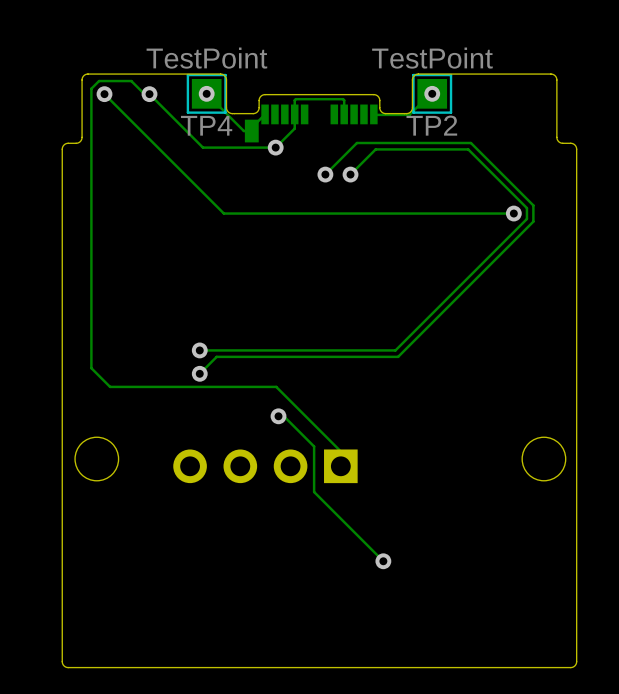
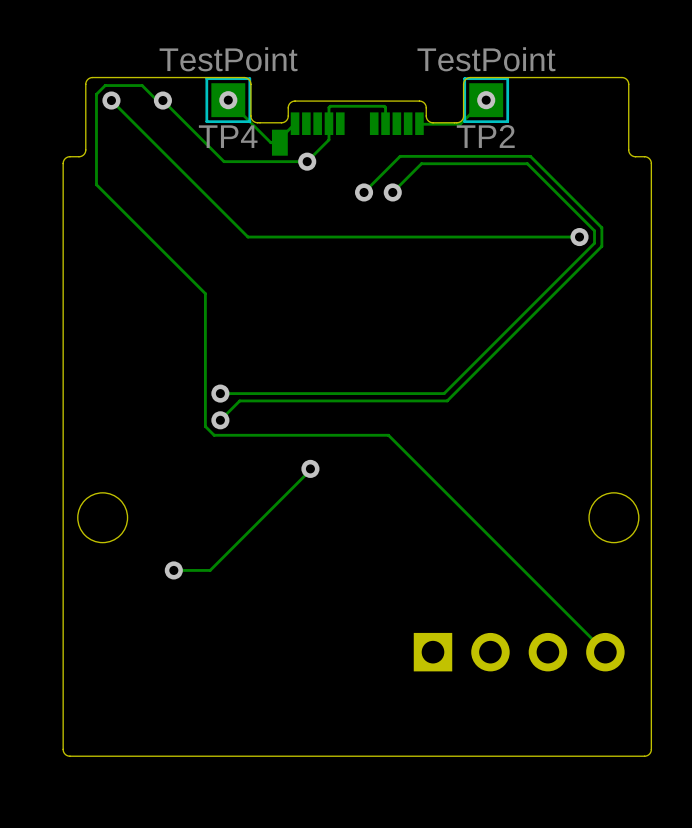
track: (91, 167) (91, 368) (110, 386) (194, 386) -> (96, 184) (205, 293) (205, 426) (214, 435)
track: (276, 386) (340, 451) (340, 466) -> (307, 435) (388, 435) (605, 652)
track: (278, 416) (283, 416) (314, 446) (314, 492) (383, 561) -> none
track: none -> (306, 474) (210, 570) (173, 570)
part rotation: 0° (265, 466) -> 180° (519, 652)
part position: (265, 466) -> (519, 652)
via: none -> (173, 570)
via: (383, 561) -> none

